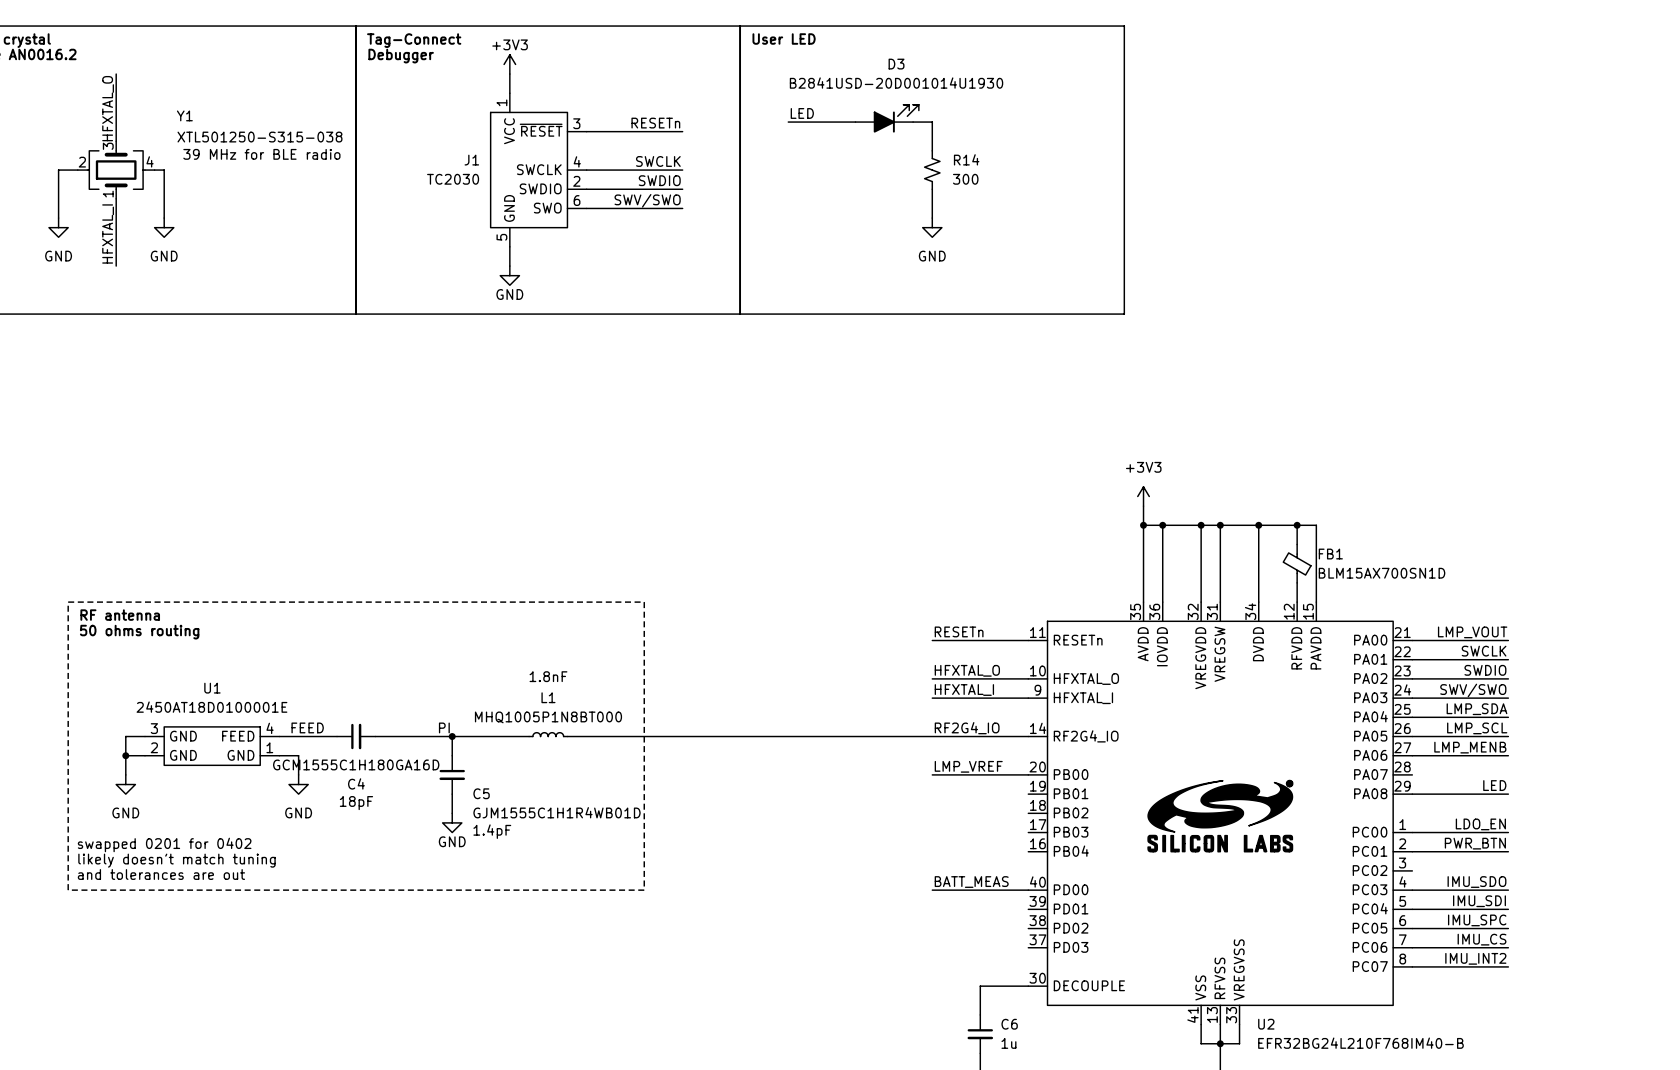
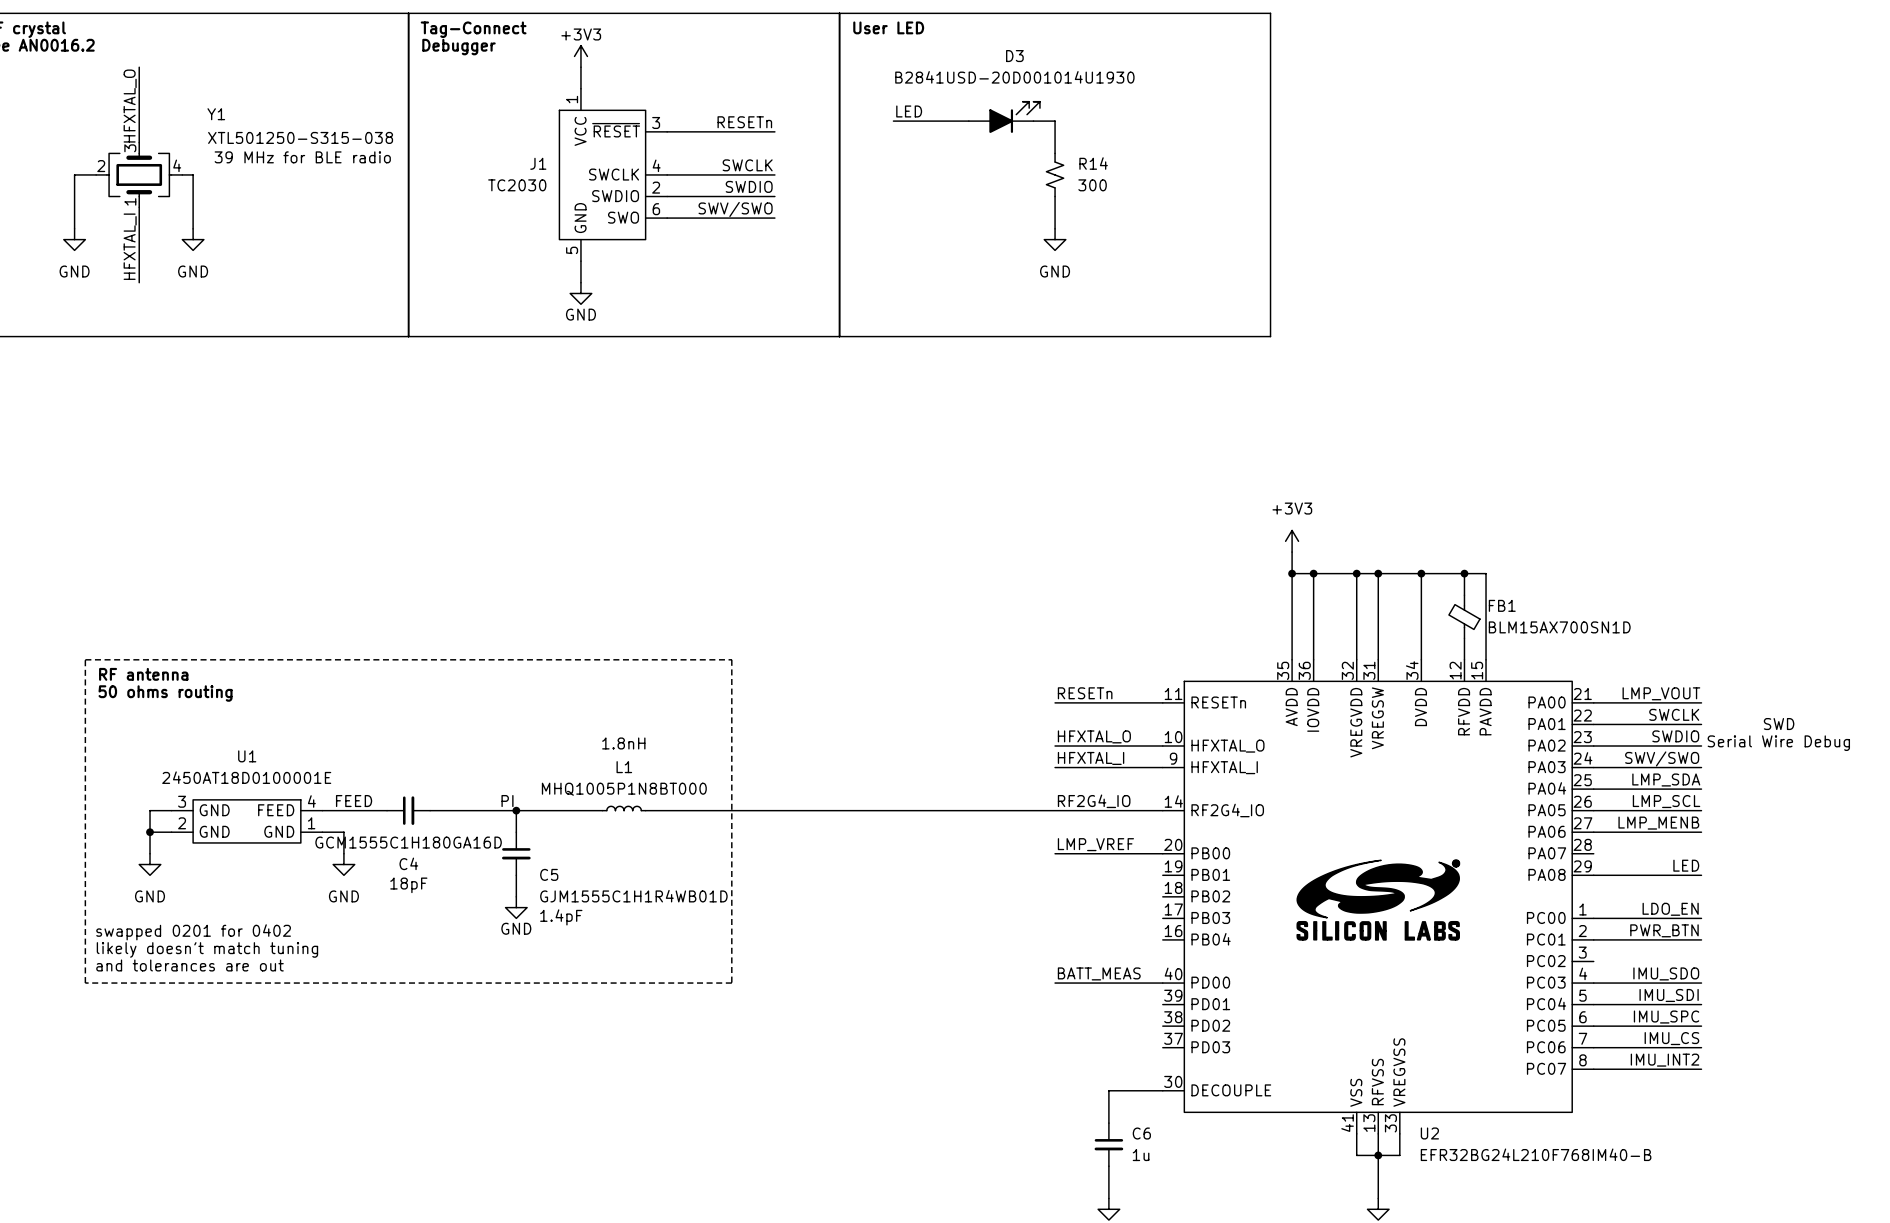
text: none -> SWD (1779, 724)
text: 1.8nF (548, 676) -> 1.8nH (623, 743)
text: none -> Serial Wire Debug (1778, 743)

